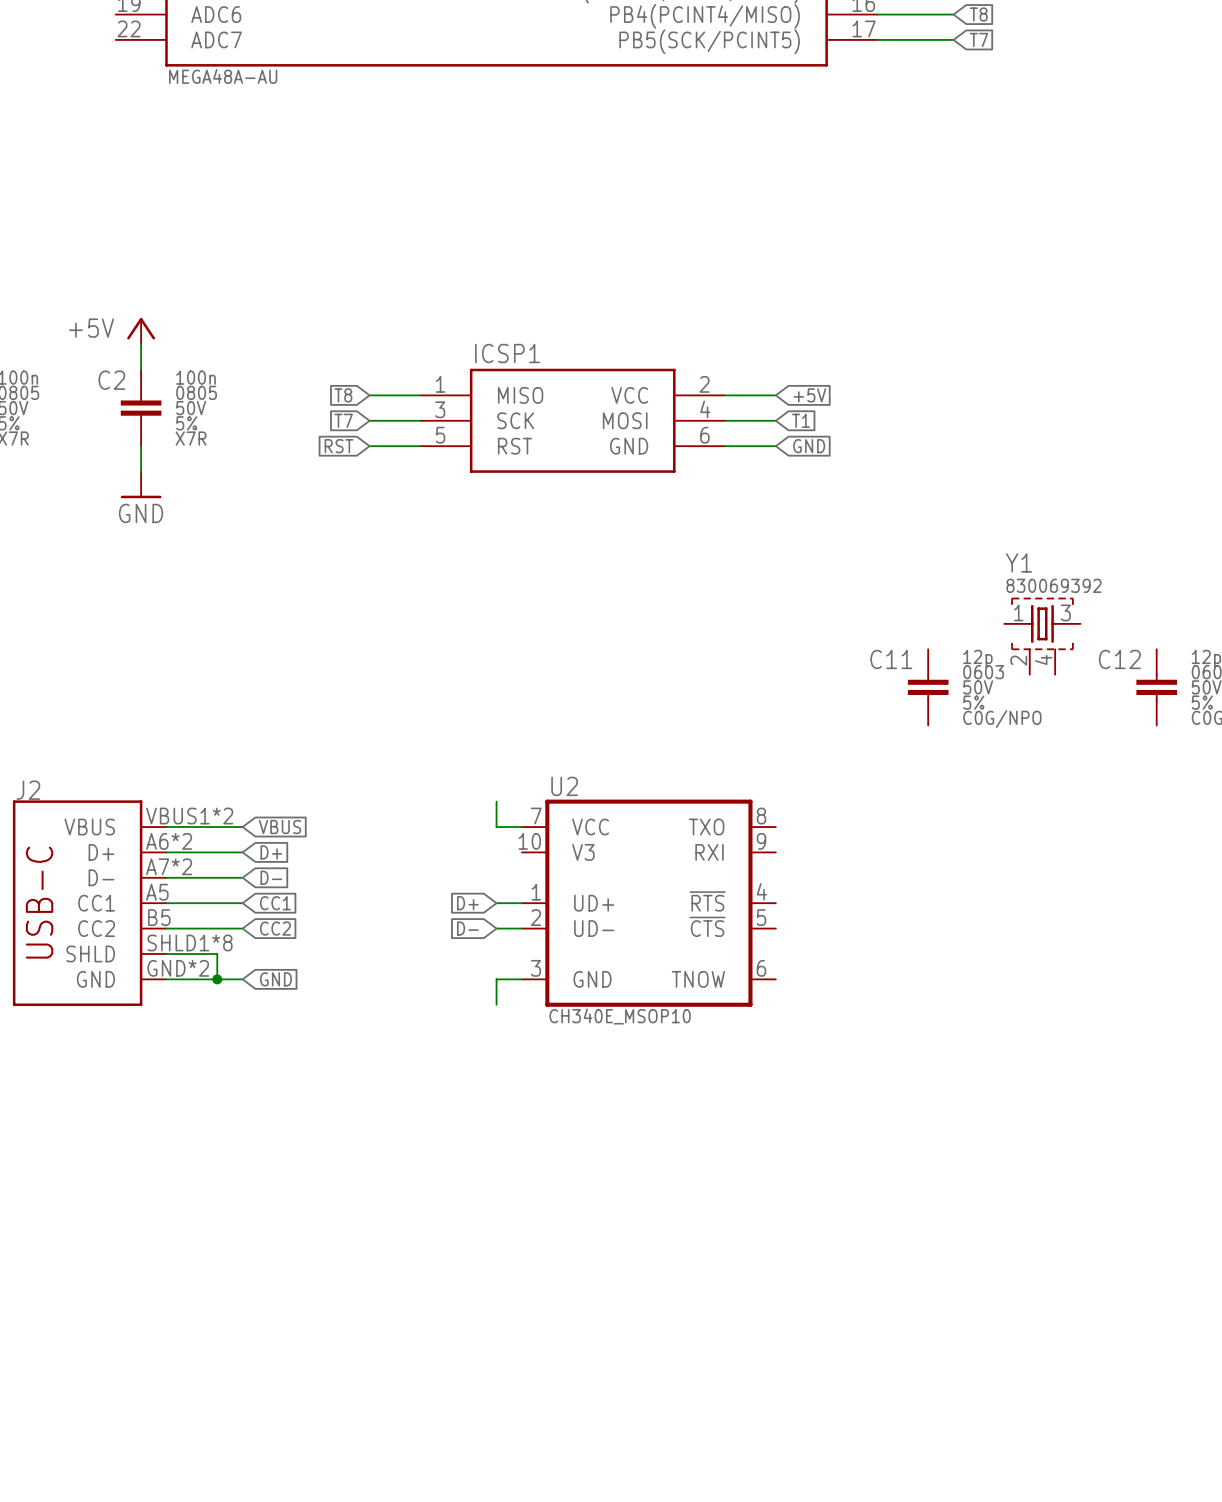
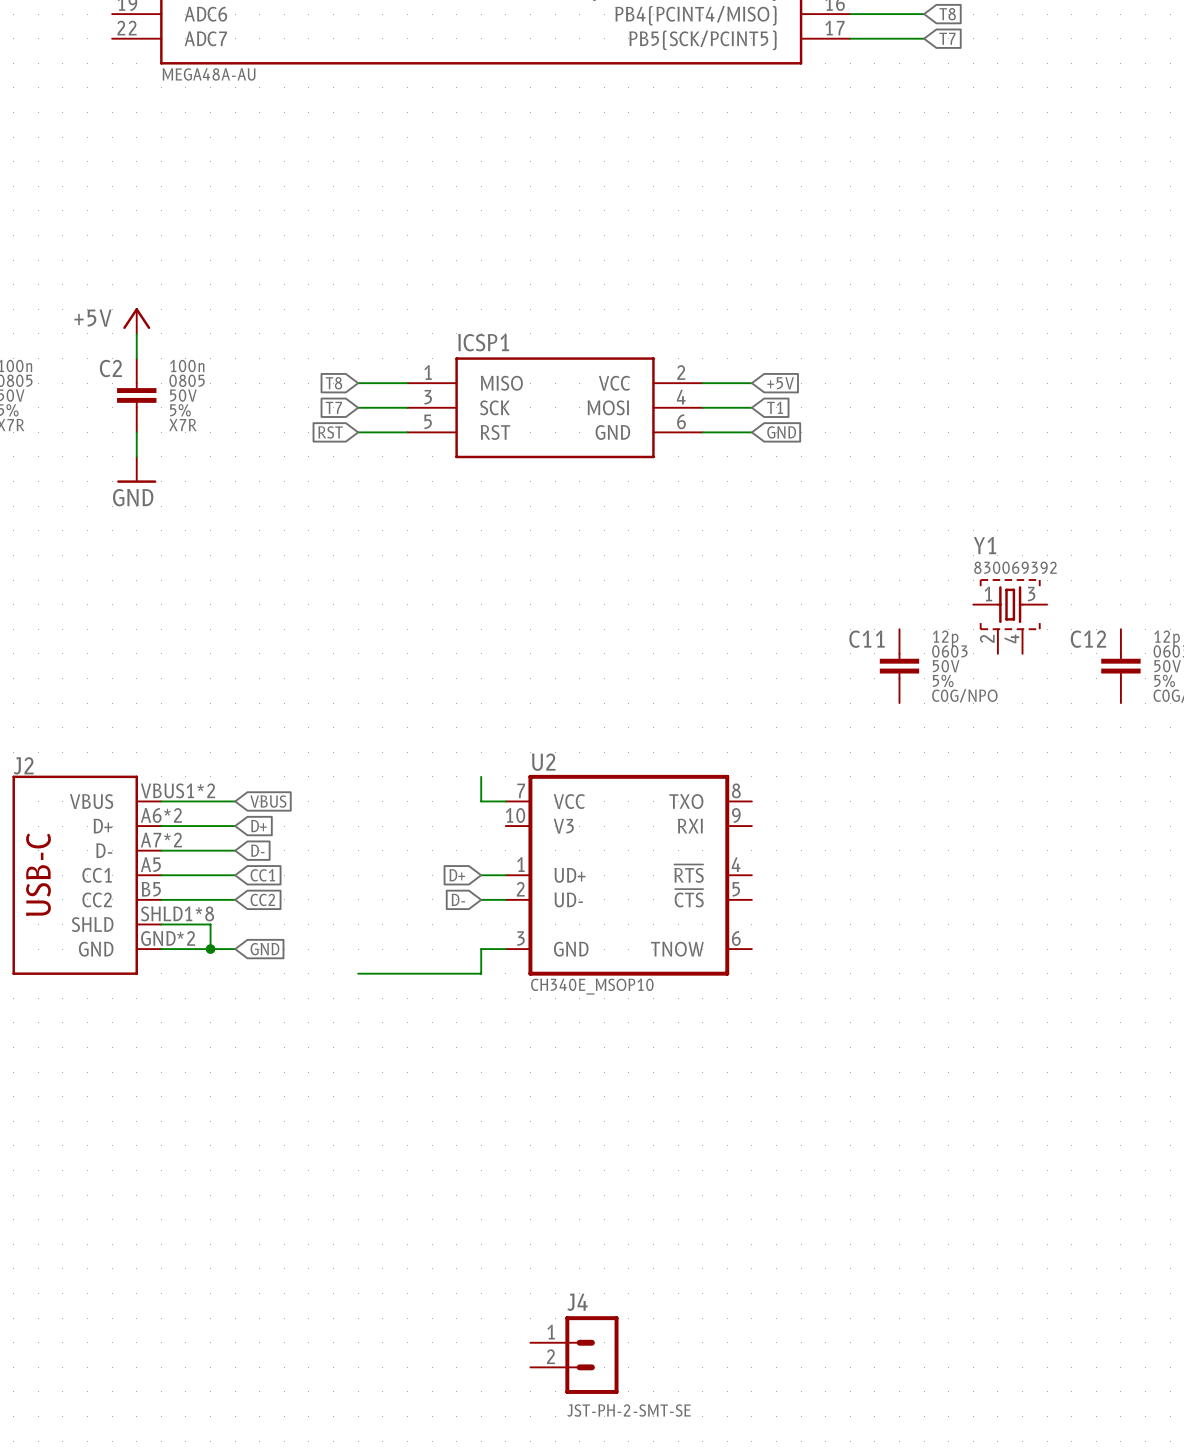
wire: none -> (358, 973) (481, 973)
J4: none -> JST-PH-2-SMT-SE (574, 1355)

